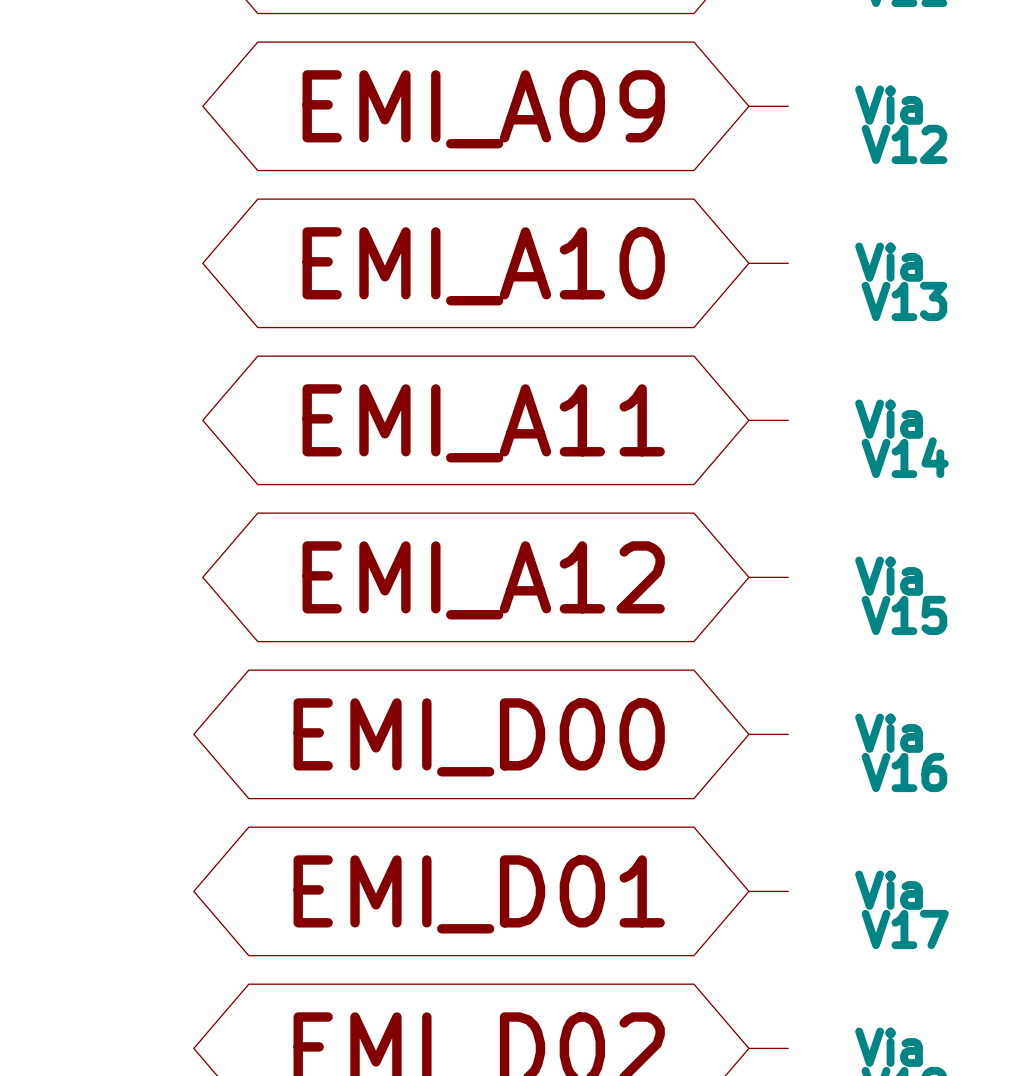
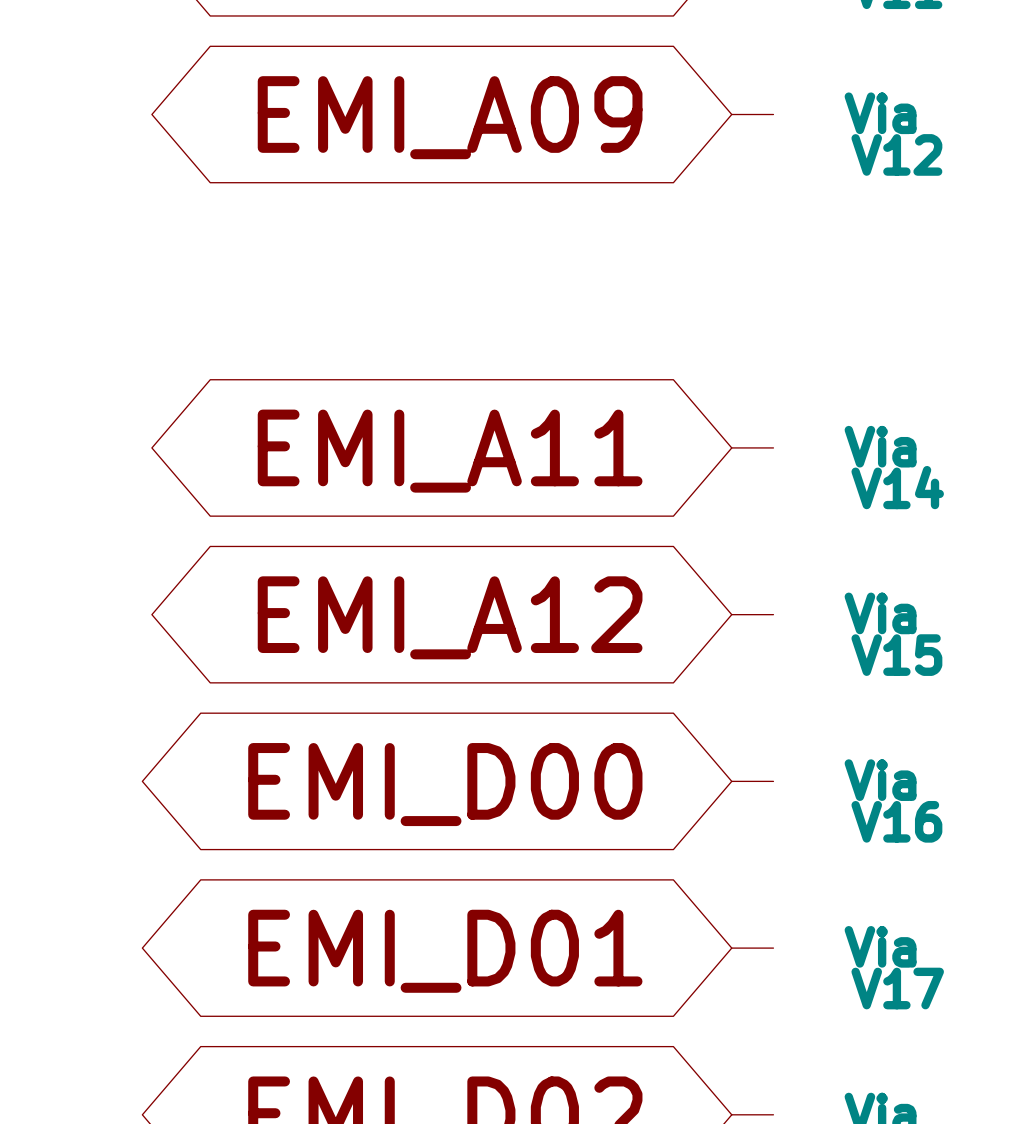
V13: (768, 263) -> none
global label: EMI_A10 (483, 266) -> none

